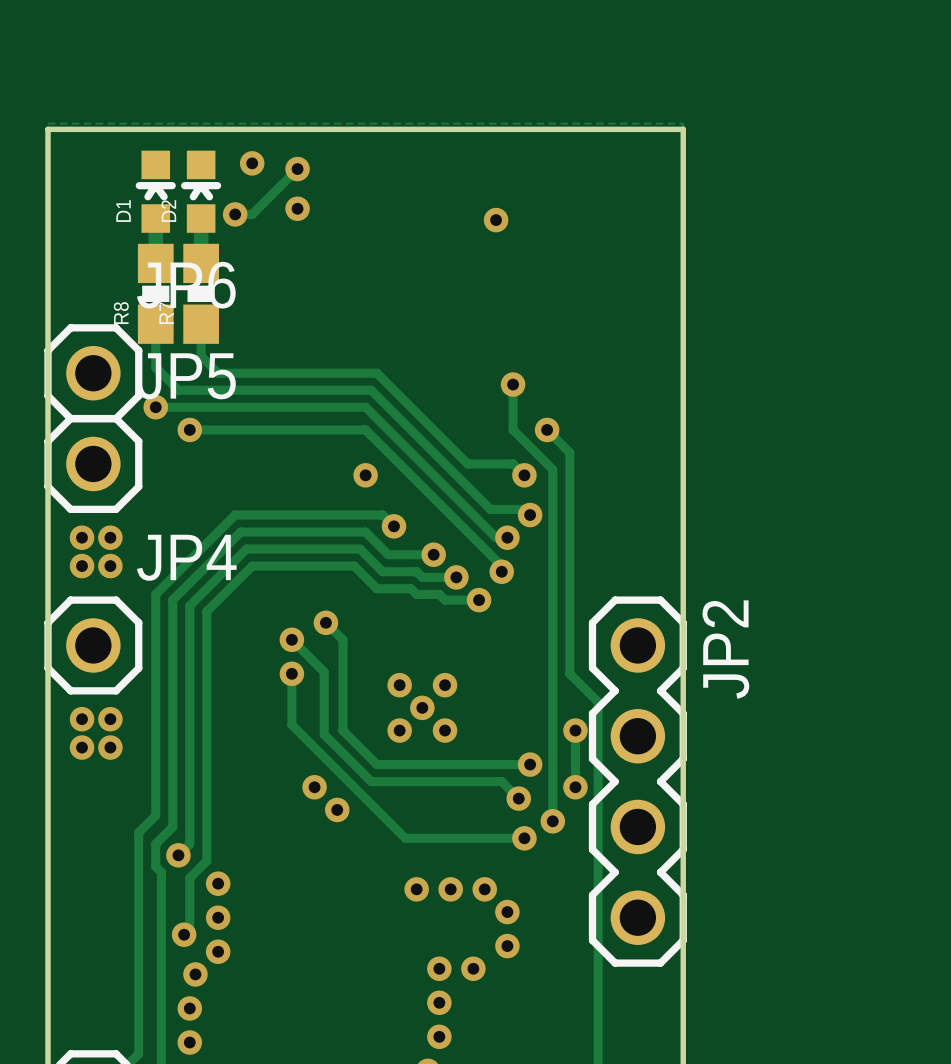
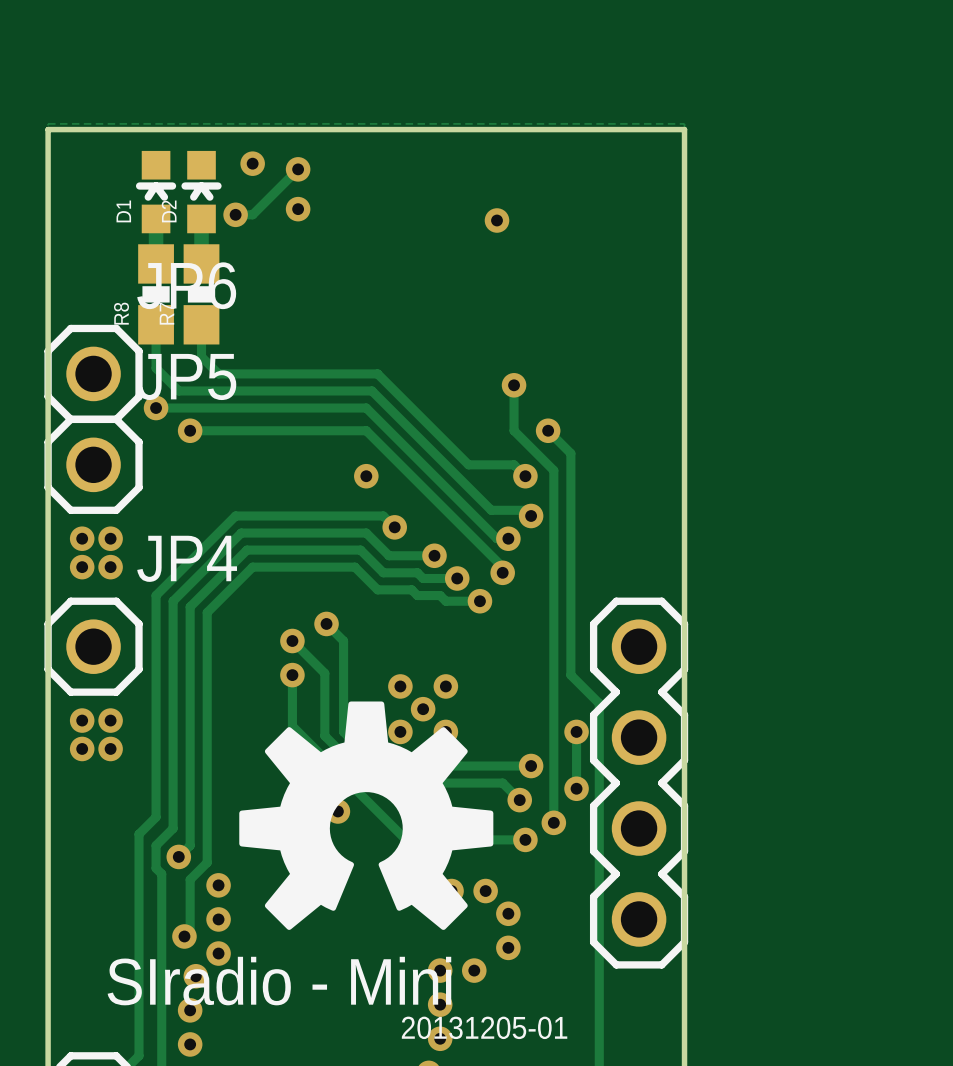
JP2 name: JP2 (725, 649) -> none
drawing: none -> [239, 701, 494, 930]
text: none -> SIradio - Mini (279, 981)
text: none -> 20131205-01 (484, 1027)

